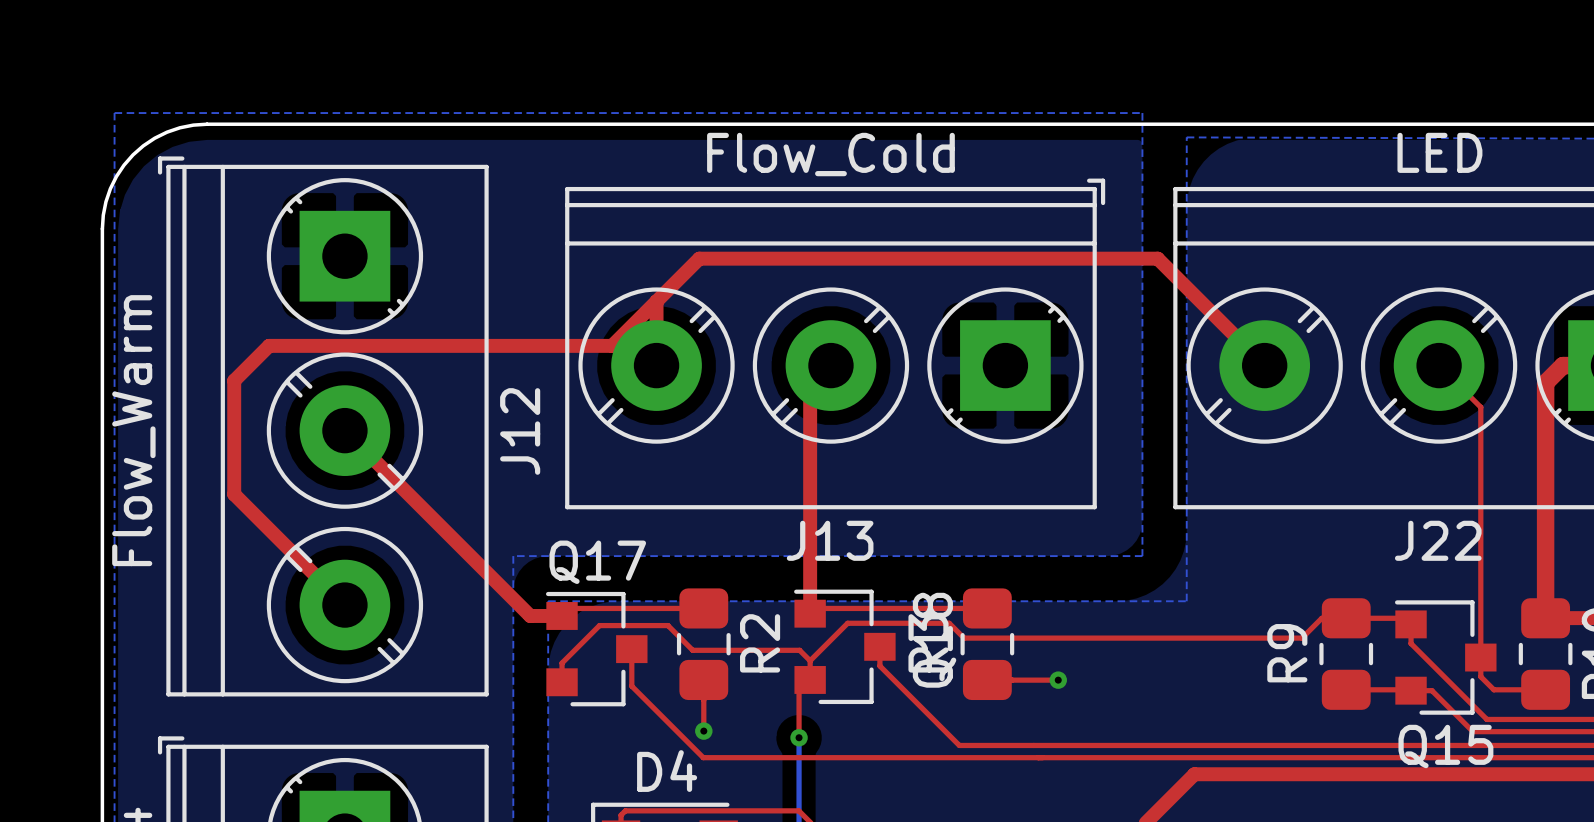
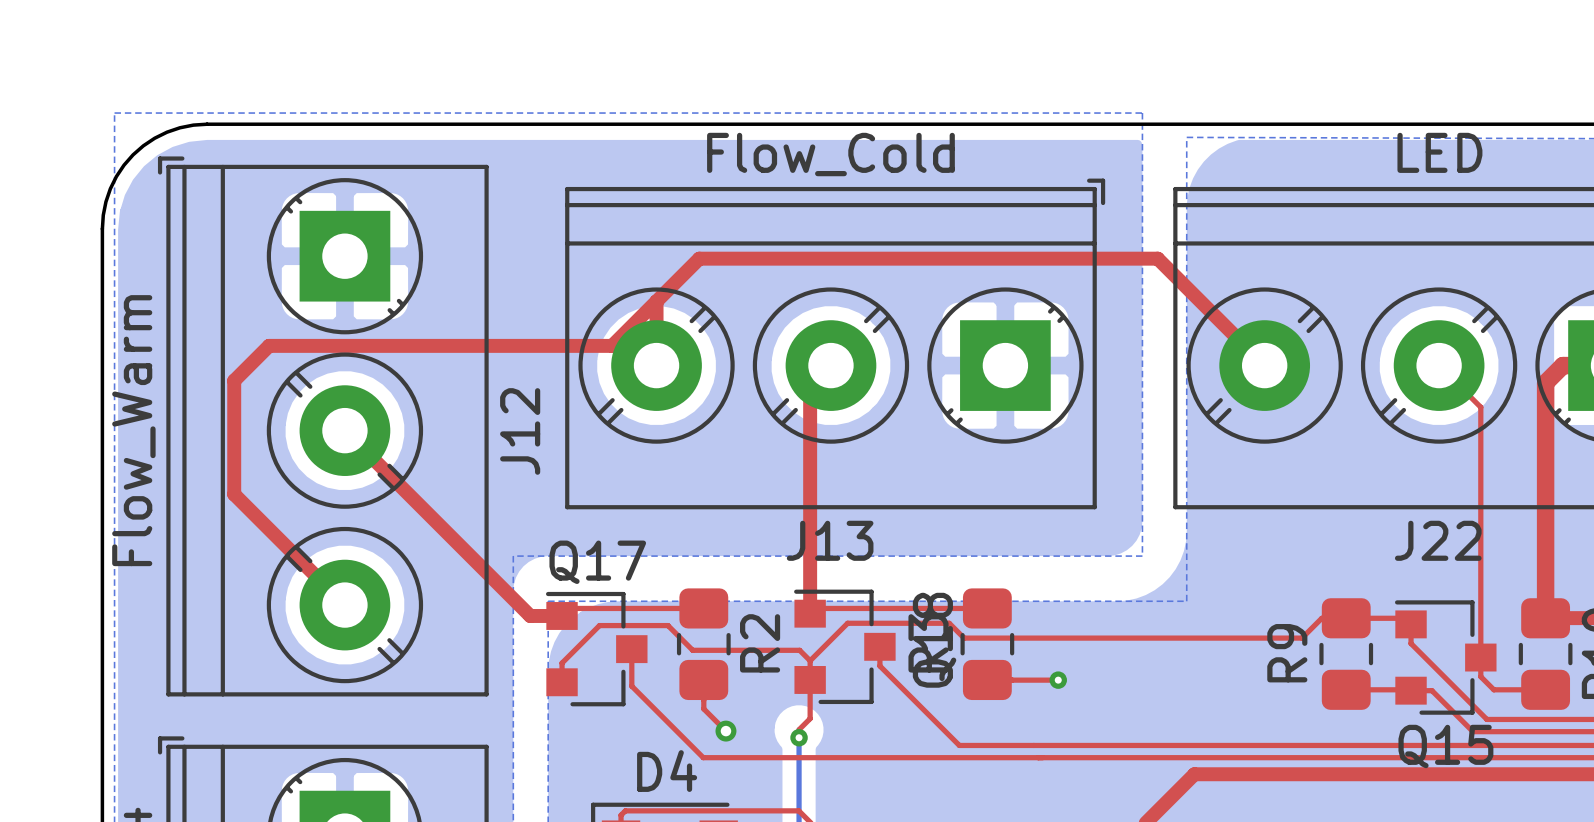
top track: none -> (810, 679) (810, 718) (799, 729)
top track: (799, 691) (799, 737) -> none
top track: (703, 708) (703, 731) -> (703, 708) (725, 731)
via: (703, 731) -> none
via: none -> (725, 731)

